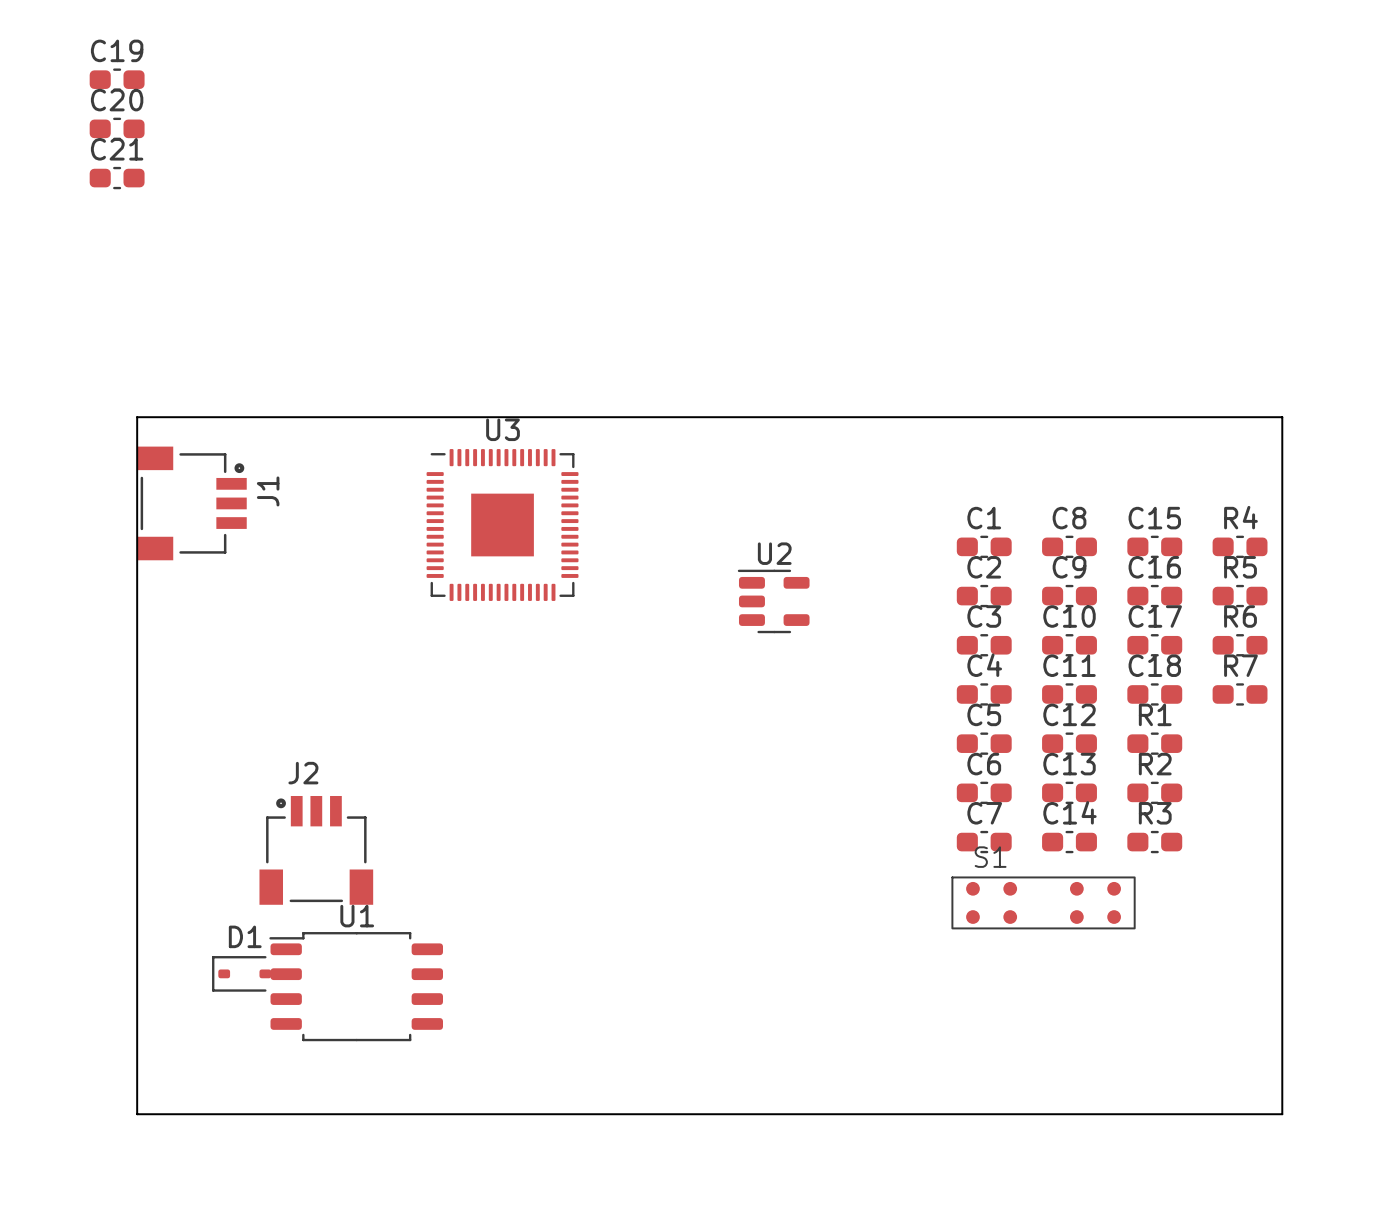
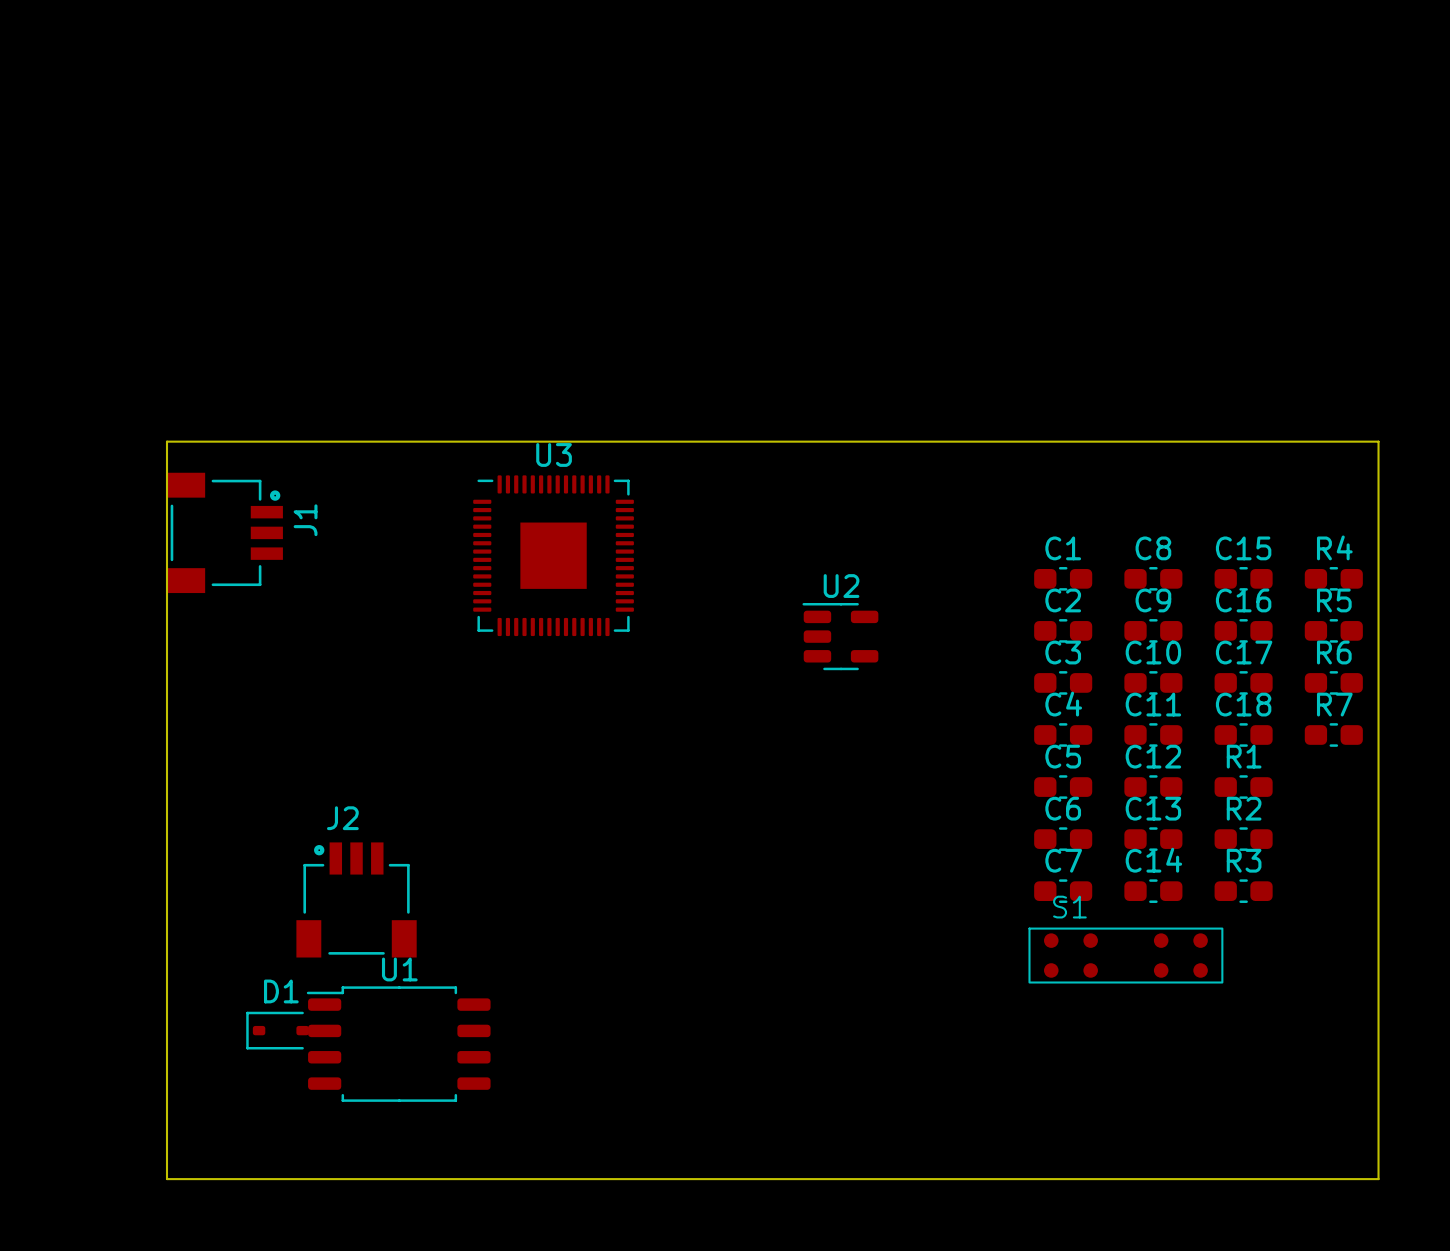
C19: (117, 79) -> none
C20: (117, 128) -> none
C21: (117, 178) -> none

